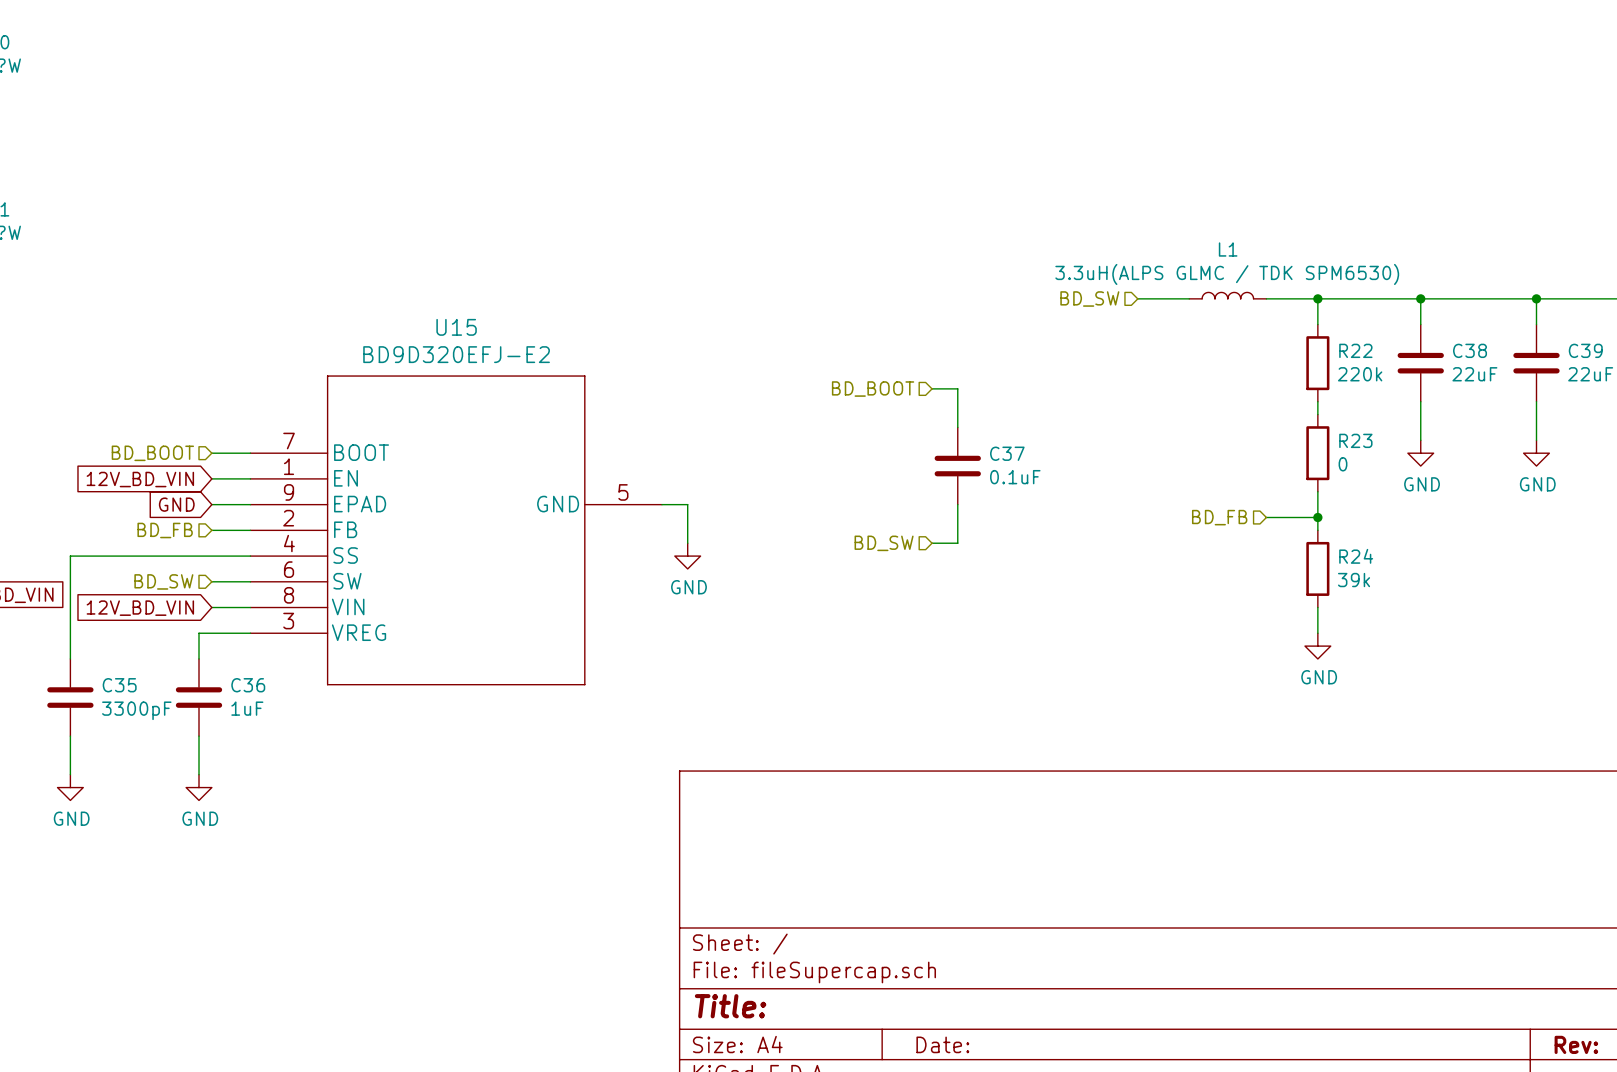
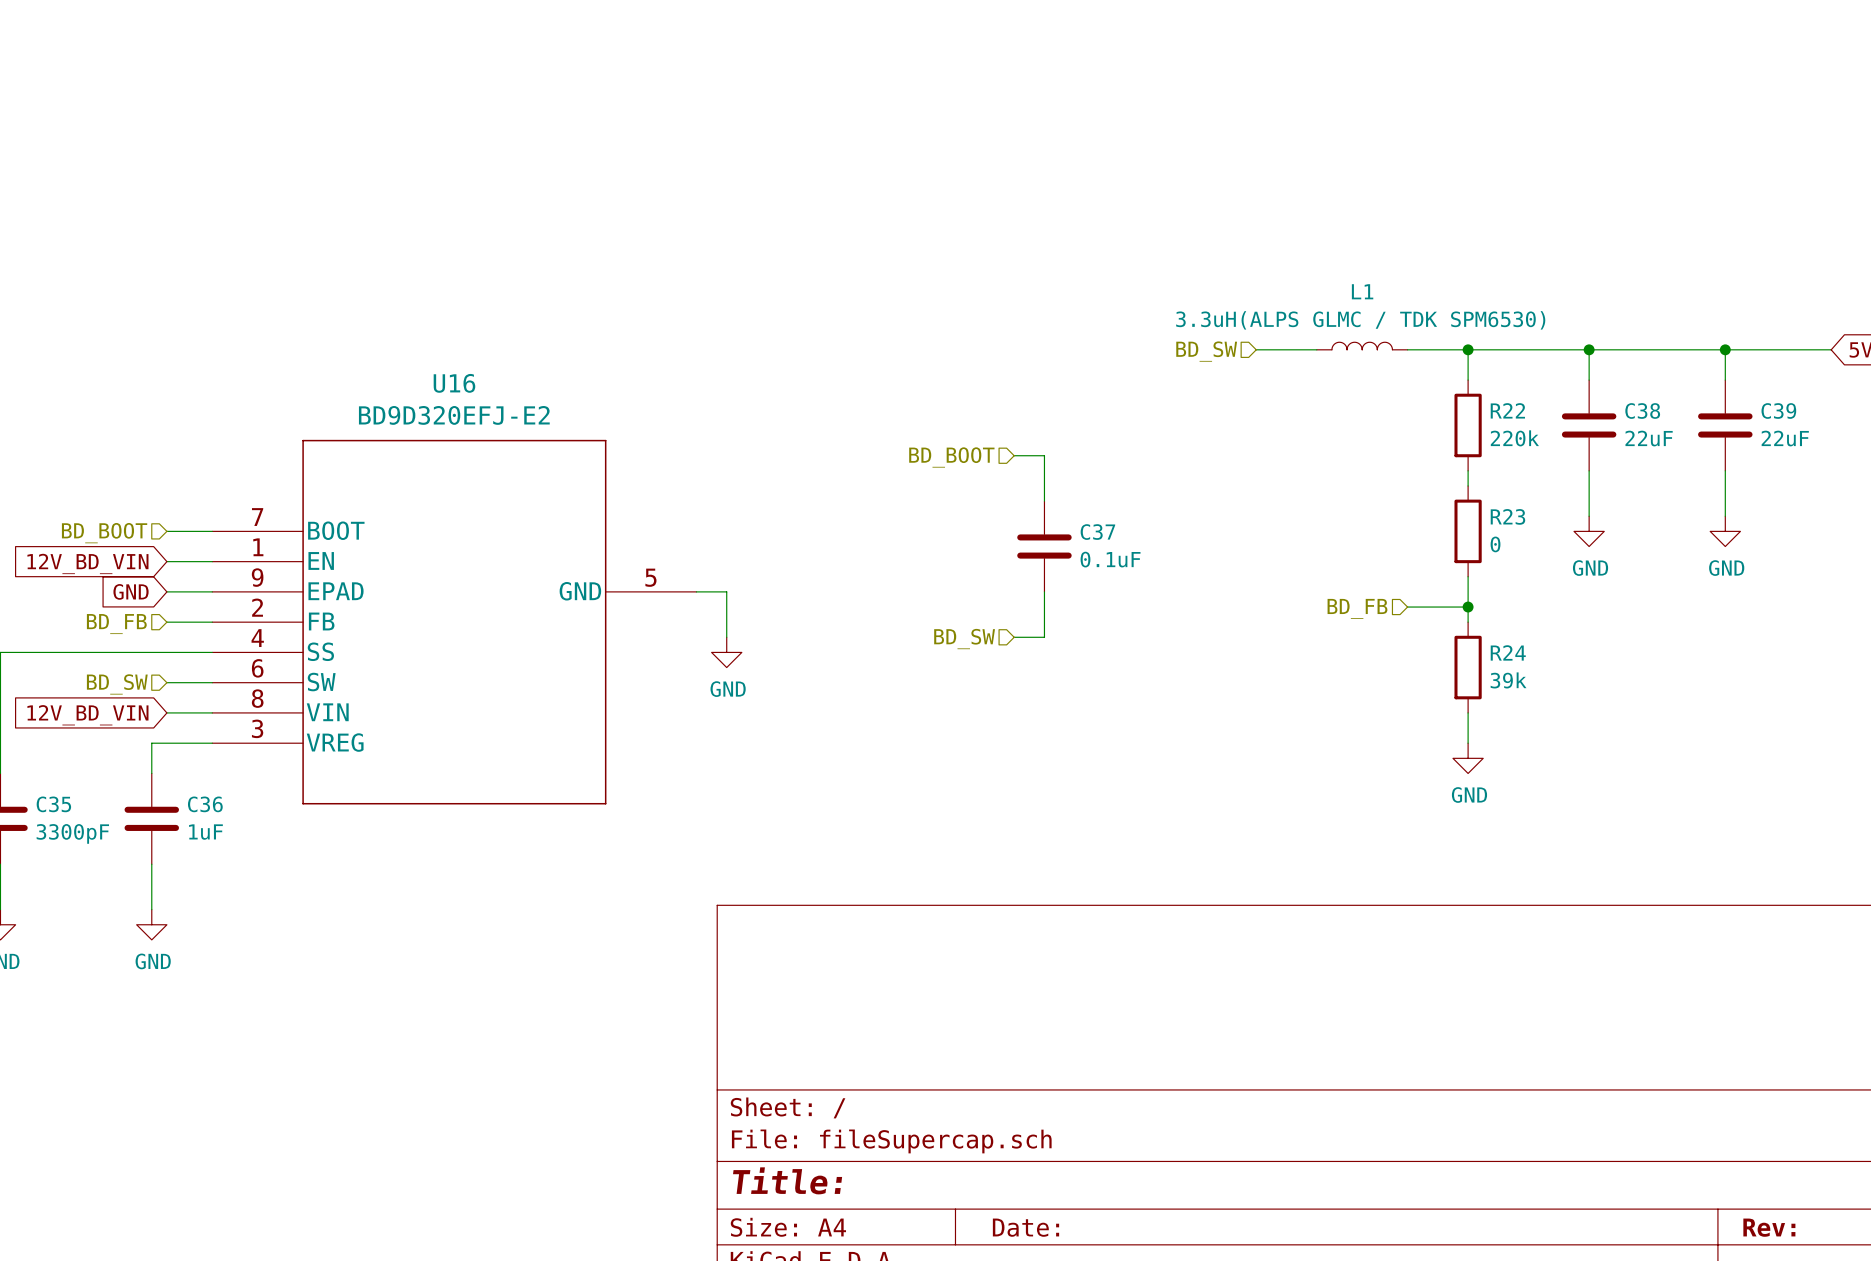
U15 name: U15 (456, 327) -> U16 (454, 383)

